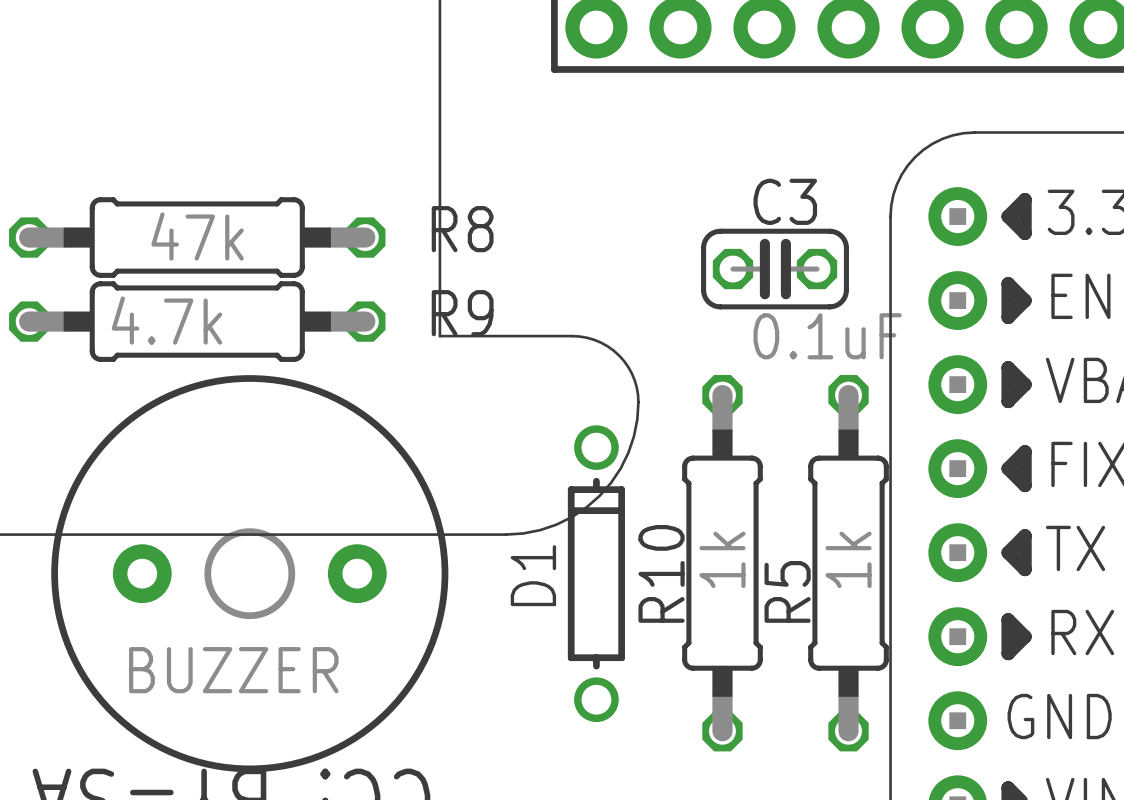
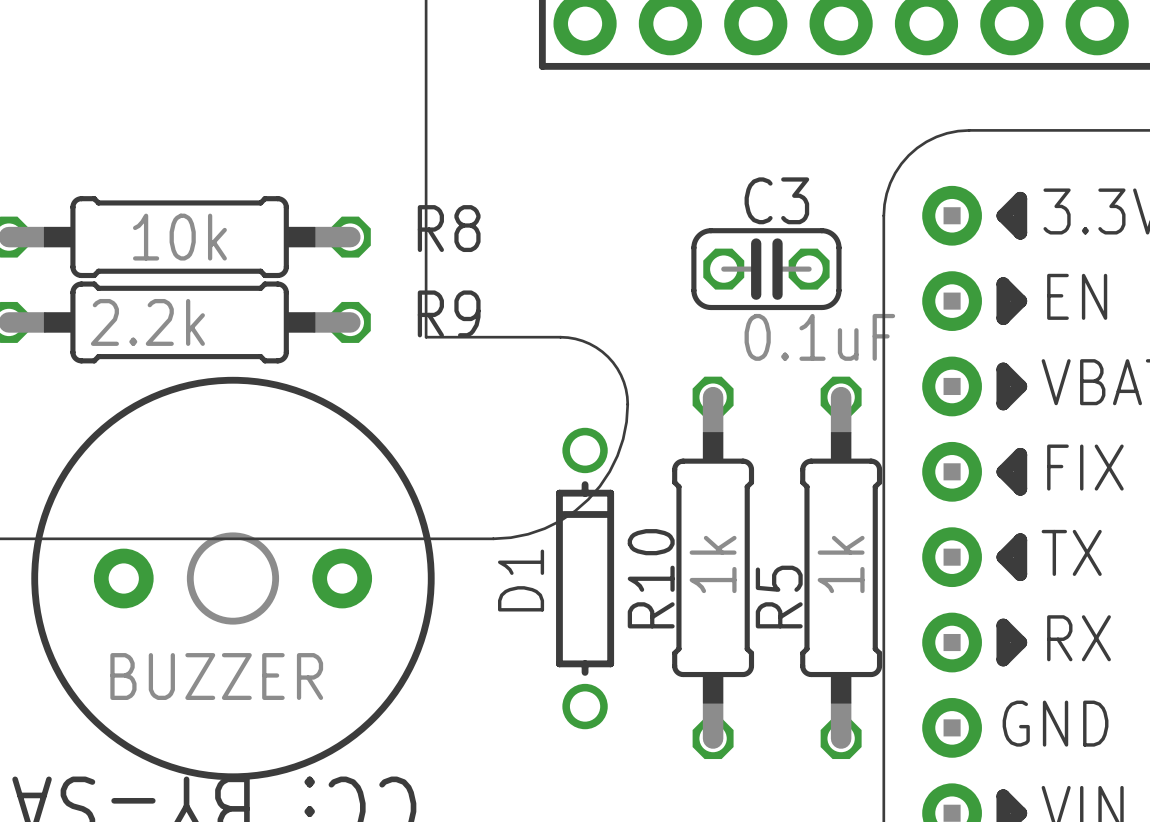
R8 value: 47k (197, 236) -> 10k (179, 237)
R9 value: 4.7k (166, 320) -> 2.2k (147, 322)

